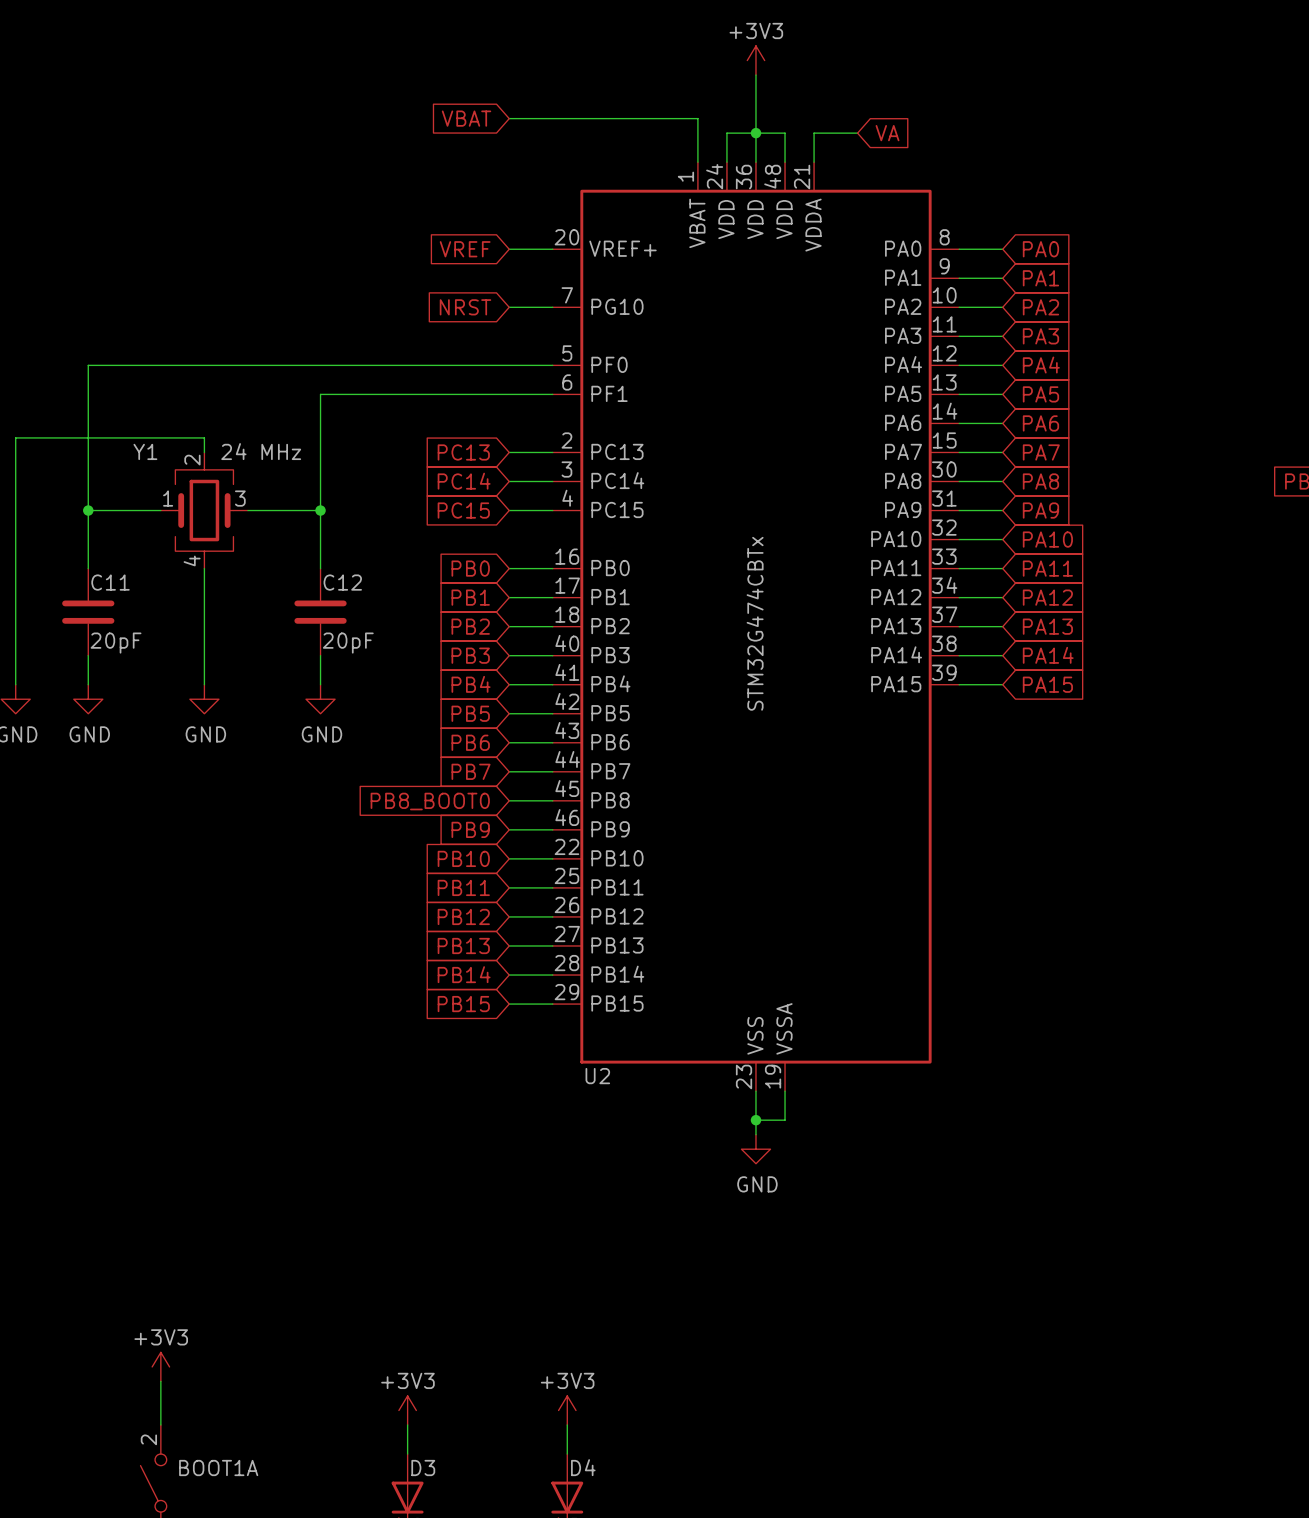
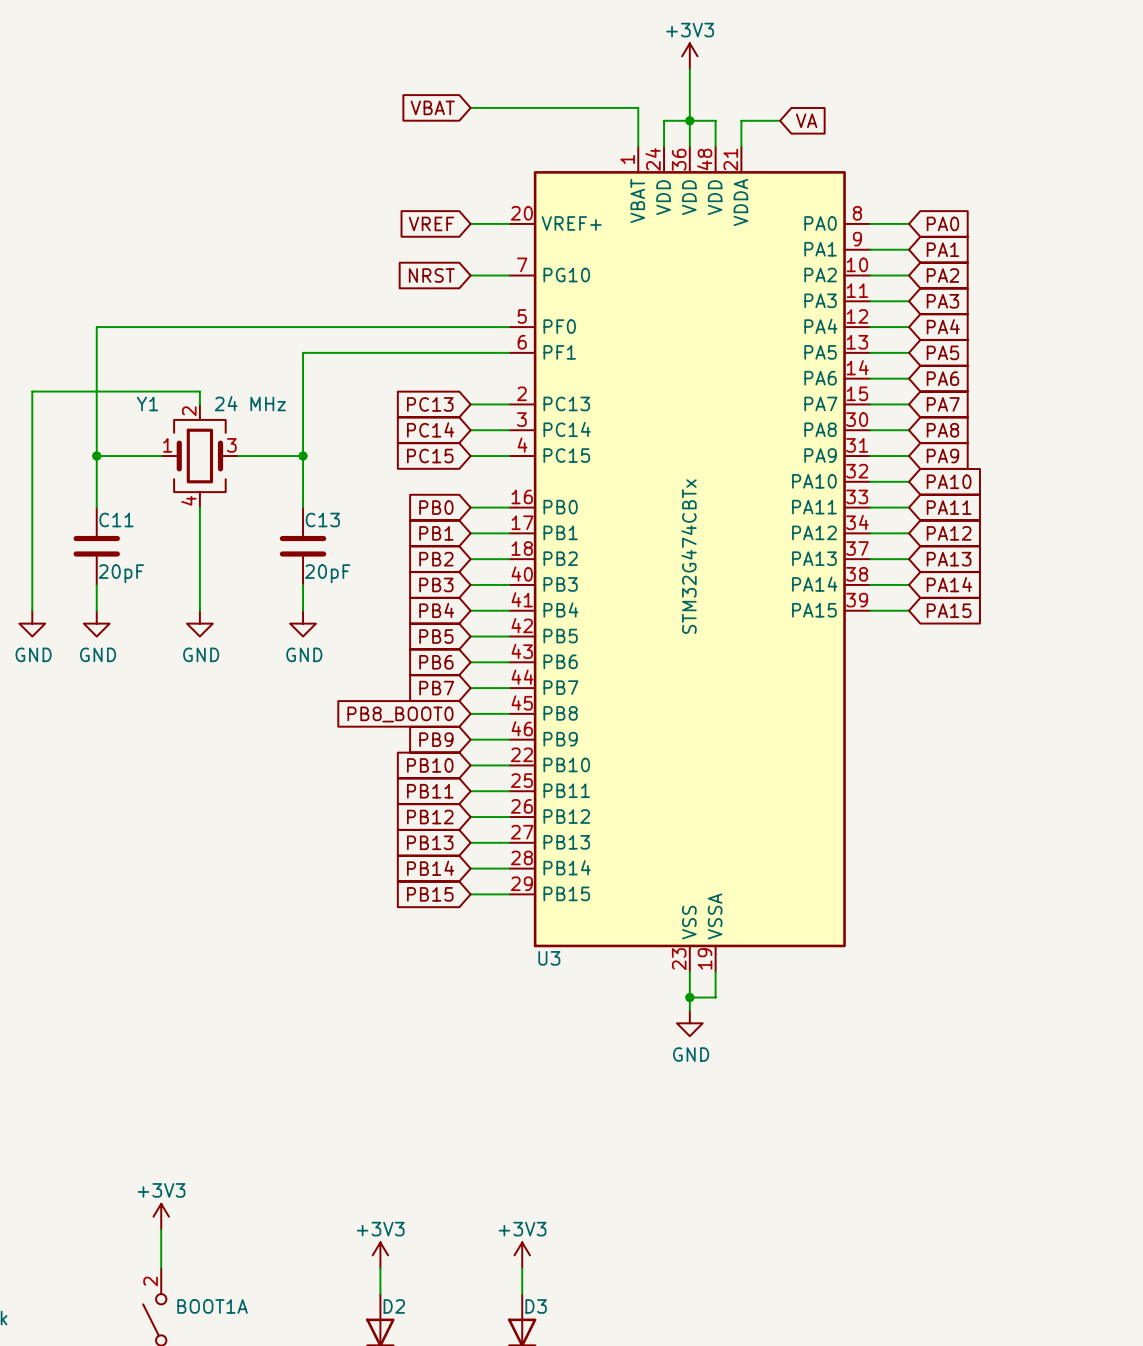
C12 name: C12 (342, 582) -> C13 (322, 520)
U2 name: U2 (597, 1076) -> U3 (549, 958)
D4 name: D4 (583, 1467) -> D3 (536, 1306)
D3 name: D3 (423, 1468) -> D2 (394, 1306)

